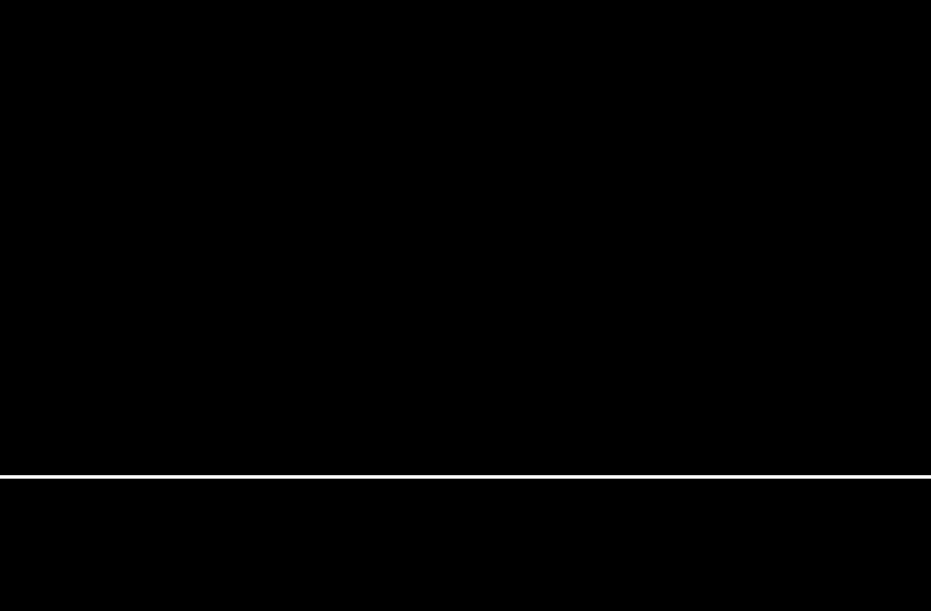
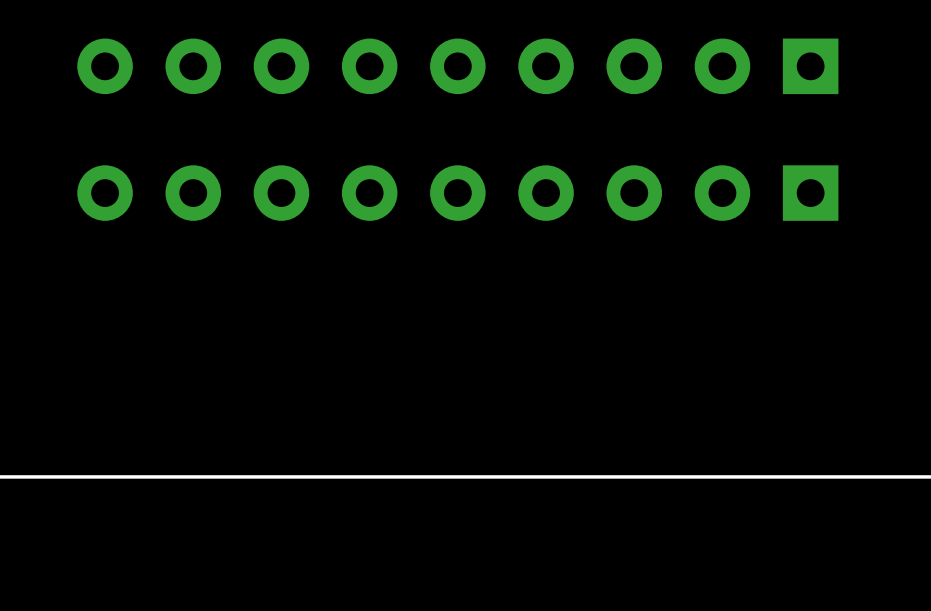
part: none -> (457, 66)
part: none -> (457, 193)

